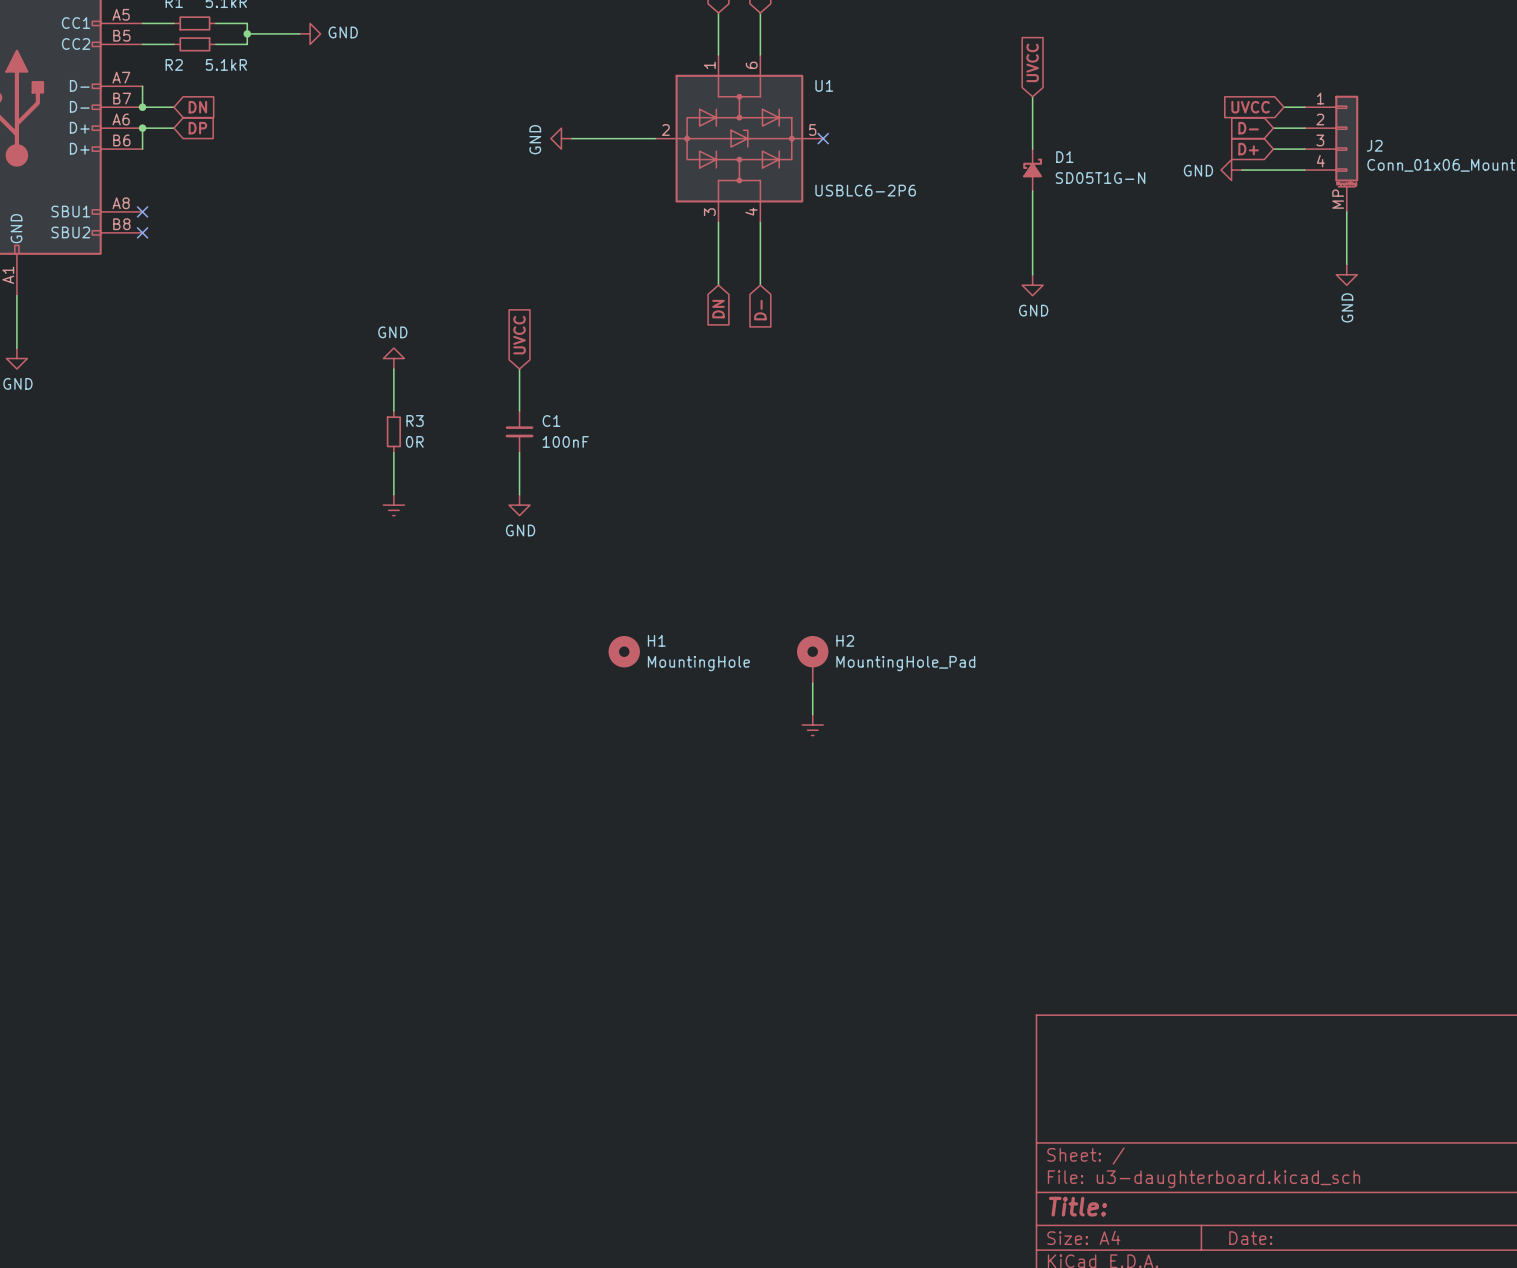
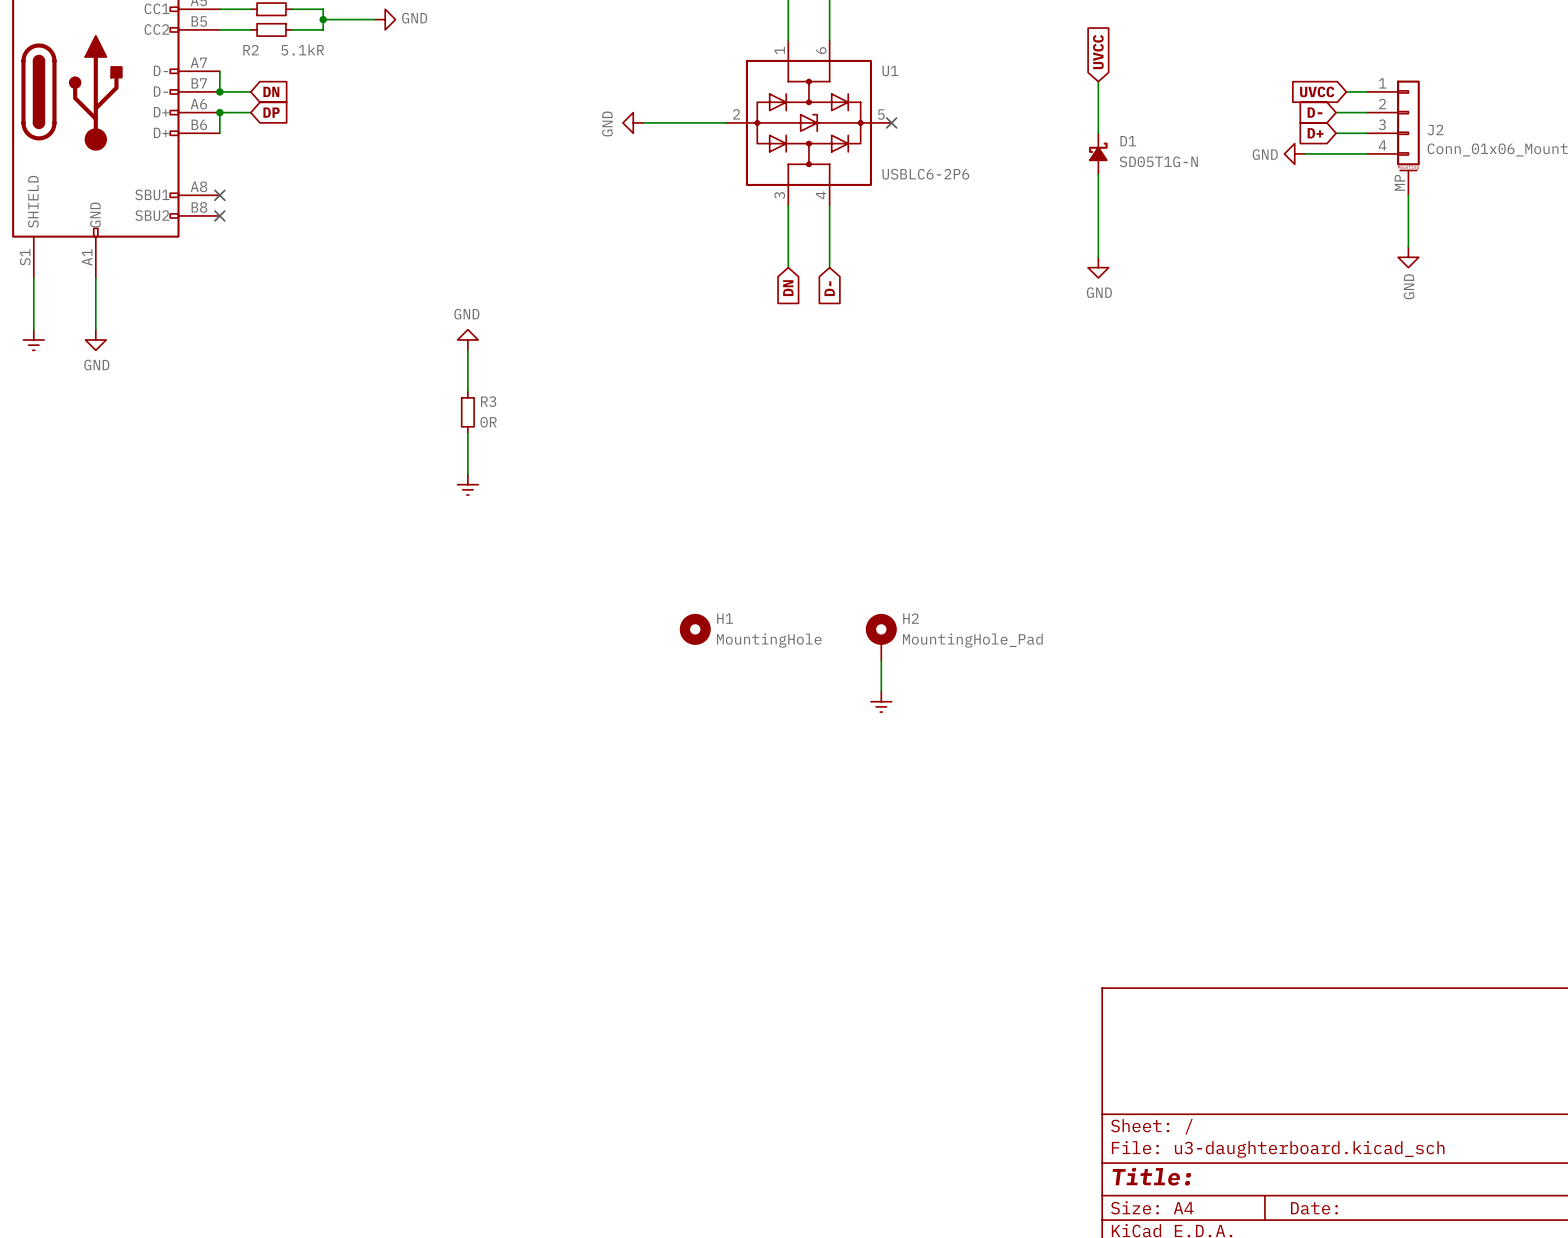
global label: UVCC (519, 335) -> none
wire: (519, 369) (519, 410) -> none
C1: 100nF (519, 431) -> none
wire: (519, 452) (519, 494) -> none
power symbol: GND (519, 505) -> none

